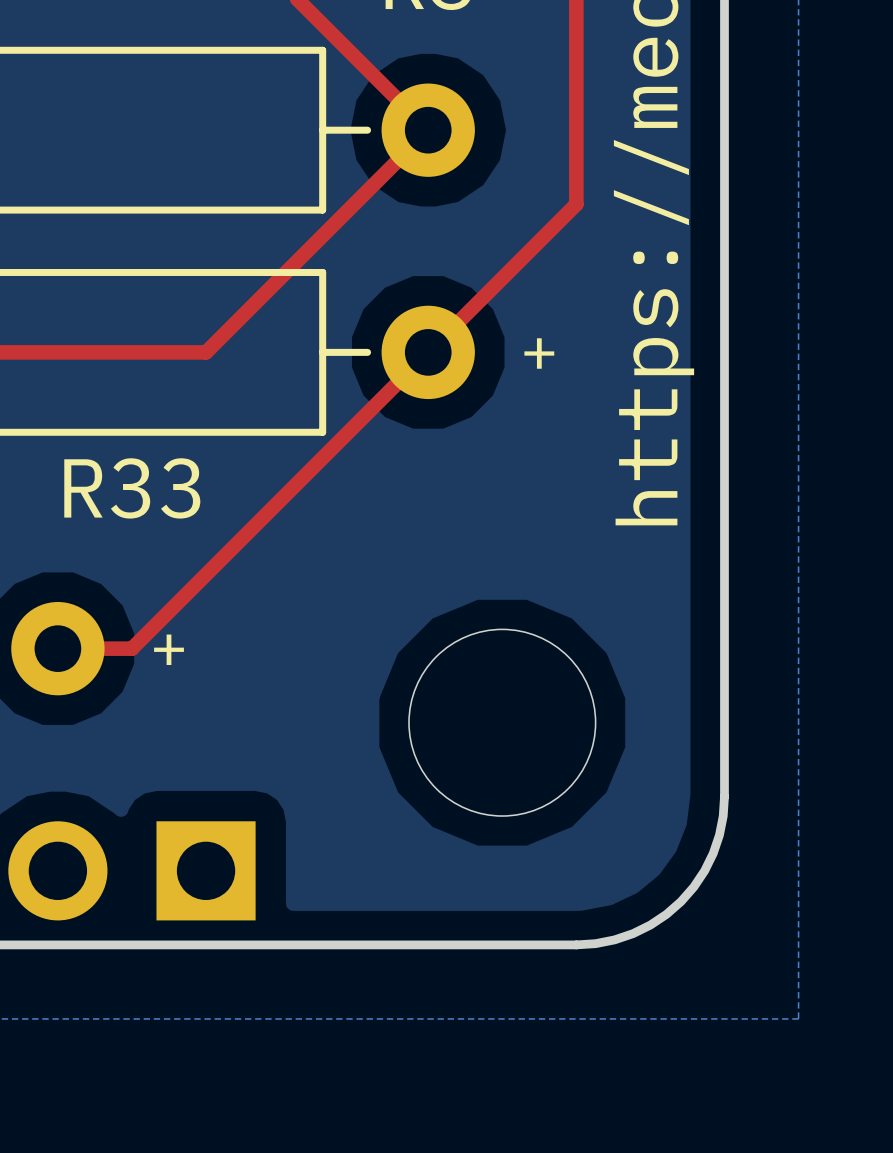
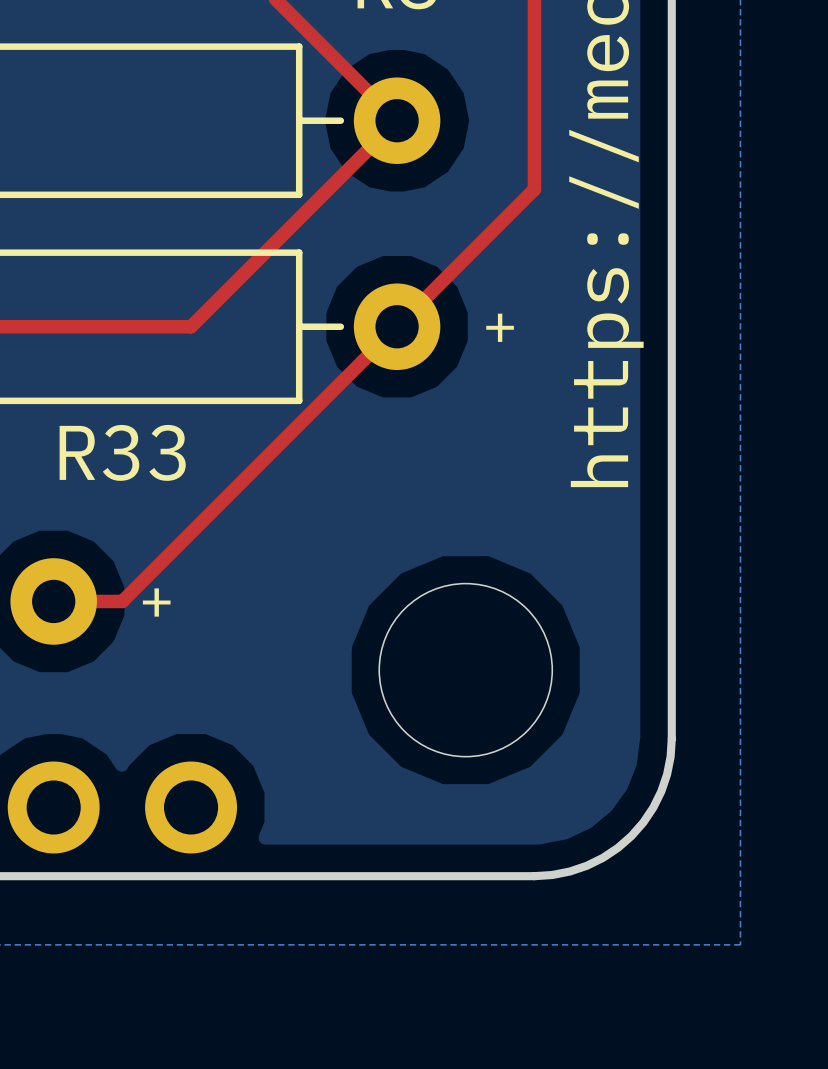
part footprint: [8, 821, 256, 921] -> [7, 761, 238, 854]

